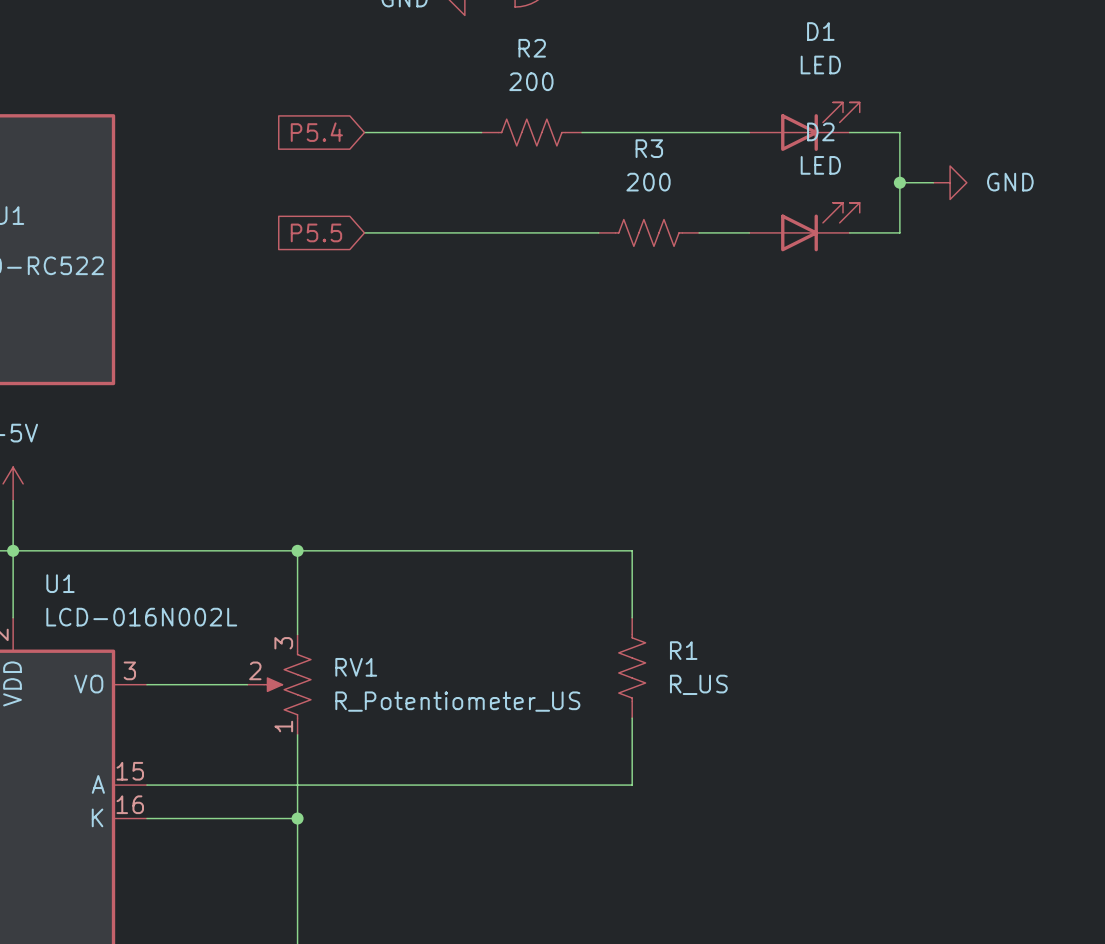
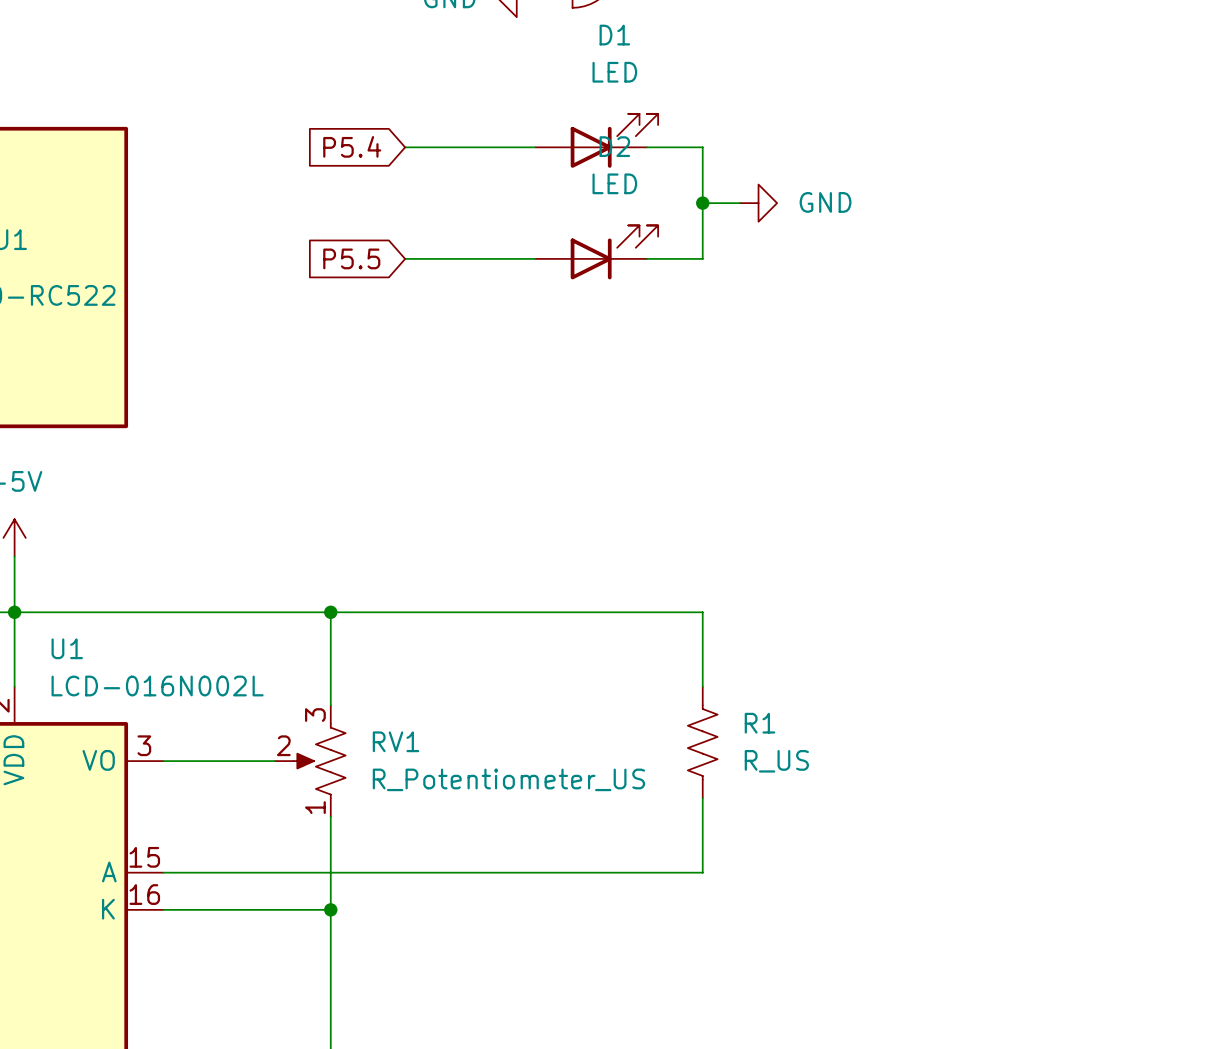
D1 position: (804, 126) -> (596, 140)
R2: 200 (531, 132) -> none
wire: (632, 132) (749, 132) -> (702, 147) (702, 258) (665, 258)
wire: (849, 132) (899, 132) (899, 232) (849, 232) -> none
junction: none -> (702, 203)
wire: (899, 182) (933, 182) -> (702, 203) (739, 203)
junction: (899, 182) -> none
power symbol position: GND (950, 182) -> GND (758, 203)
D2 position: (804, 227) -> (596, 252)
R3: 200 (648, 232) -> none
wire: (699, 232) (749, 232) -> none

